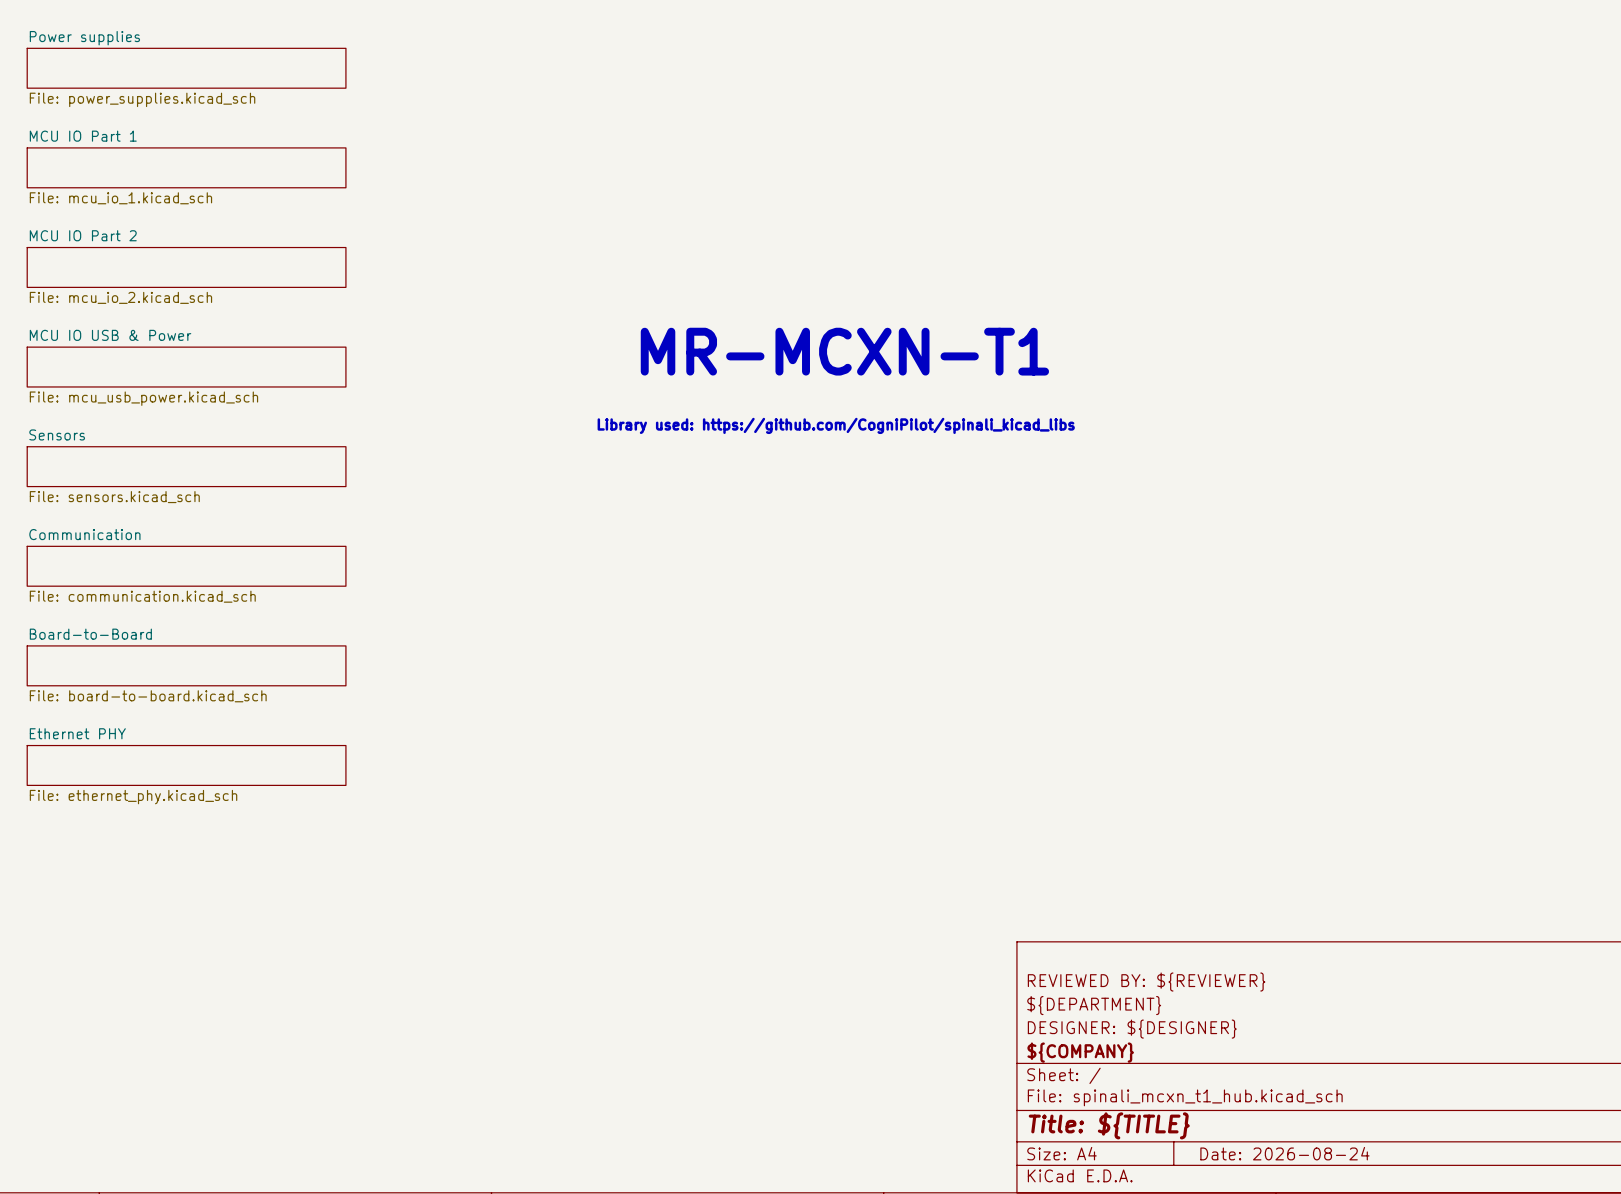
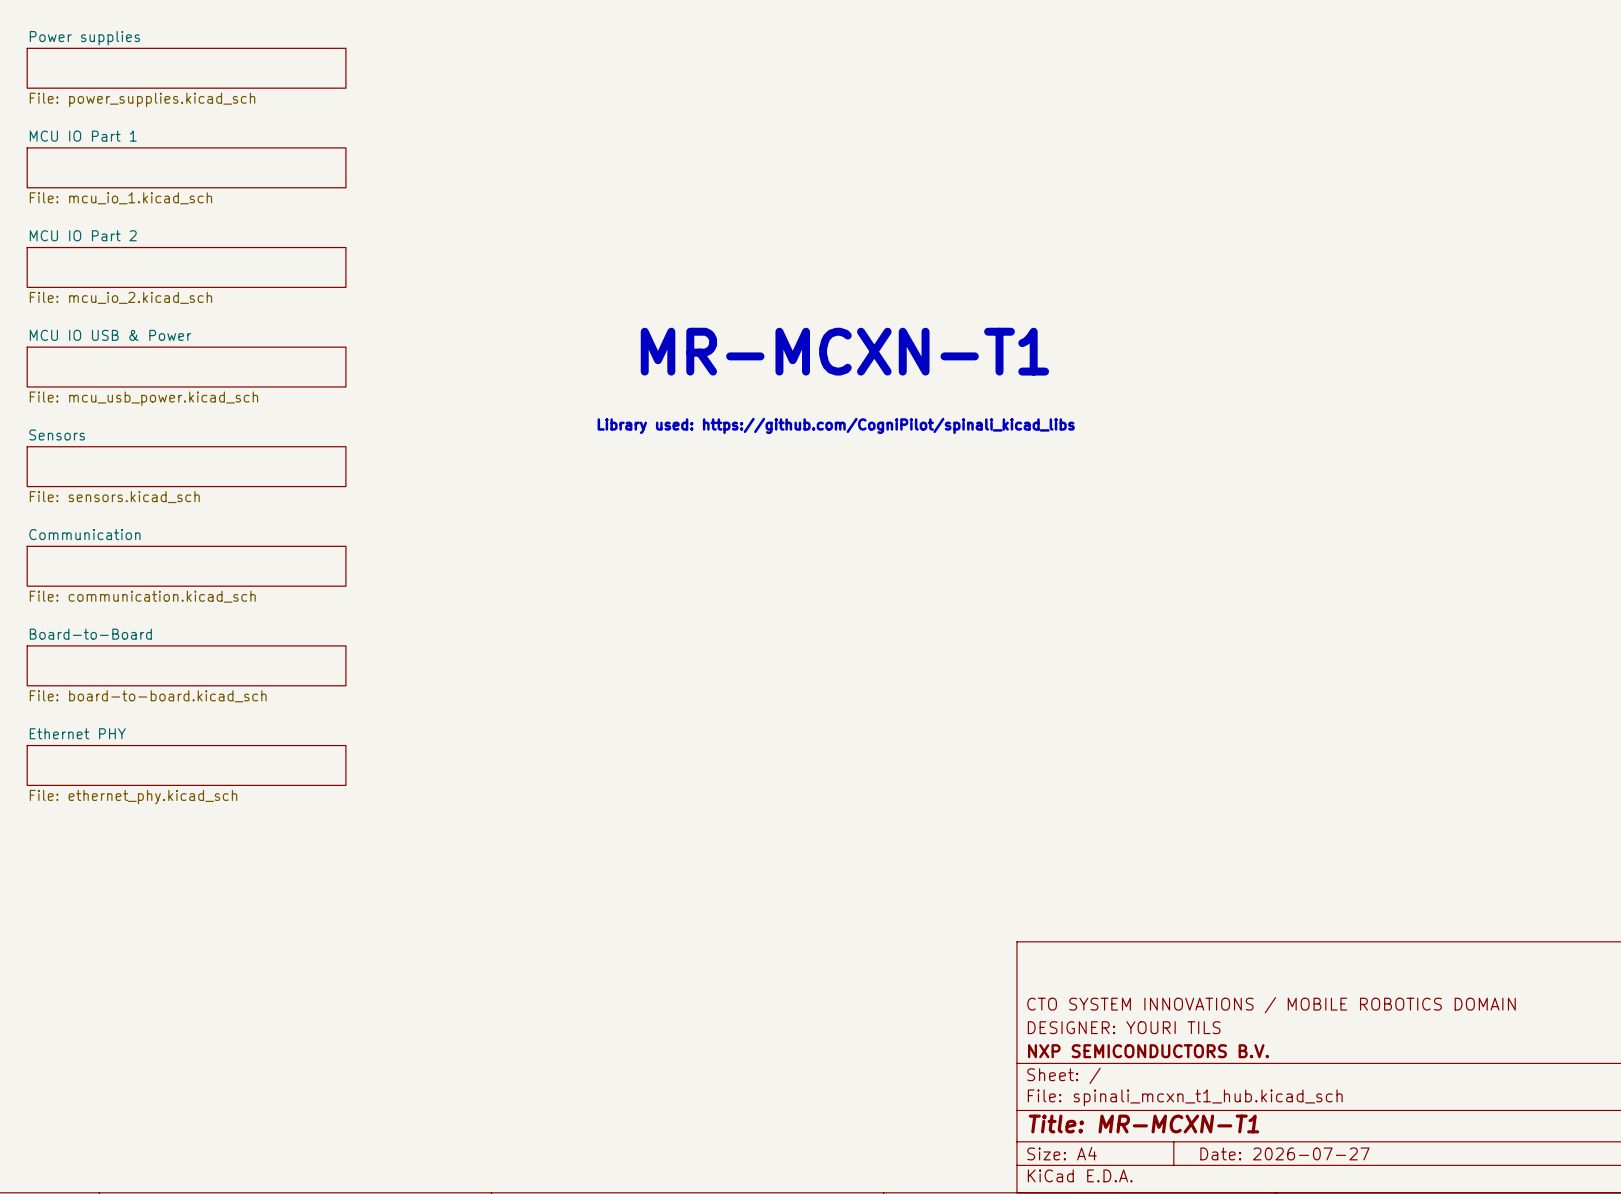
title block: REVIEWED BY: ${REVIEWER} (1146, 982) -> none
title block: ${DEPARTMENT} (1094, 1005) -> CTO SYSTEM INNOVATIONS / MOBILE ROBOTICS DOMAIN (1271, 1005)
title block: DESIGNER: ${DESIGNER} (1132, 1029) -> DESIGNER: YOURI TILS (1124, 1027)
title block: ${COMPANY} (1080, 1052) -> NXP SEMICONDUCTORS B.V. (1148, 1051)
title block: Title: ${TITLE} (1109, 1125) -> Title: MR-MCXN-T1 (1143, 1123)
title block: Date: 2026-08-24 (1284, 1153) -> Date: 2026-07-27 (1284, 1153)

